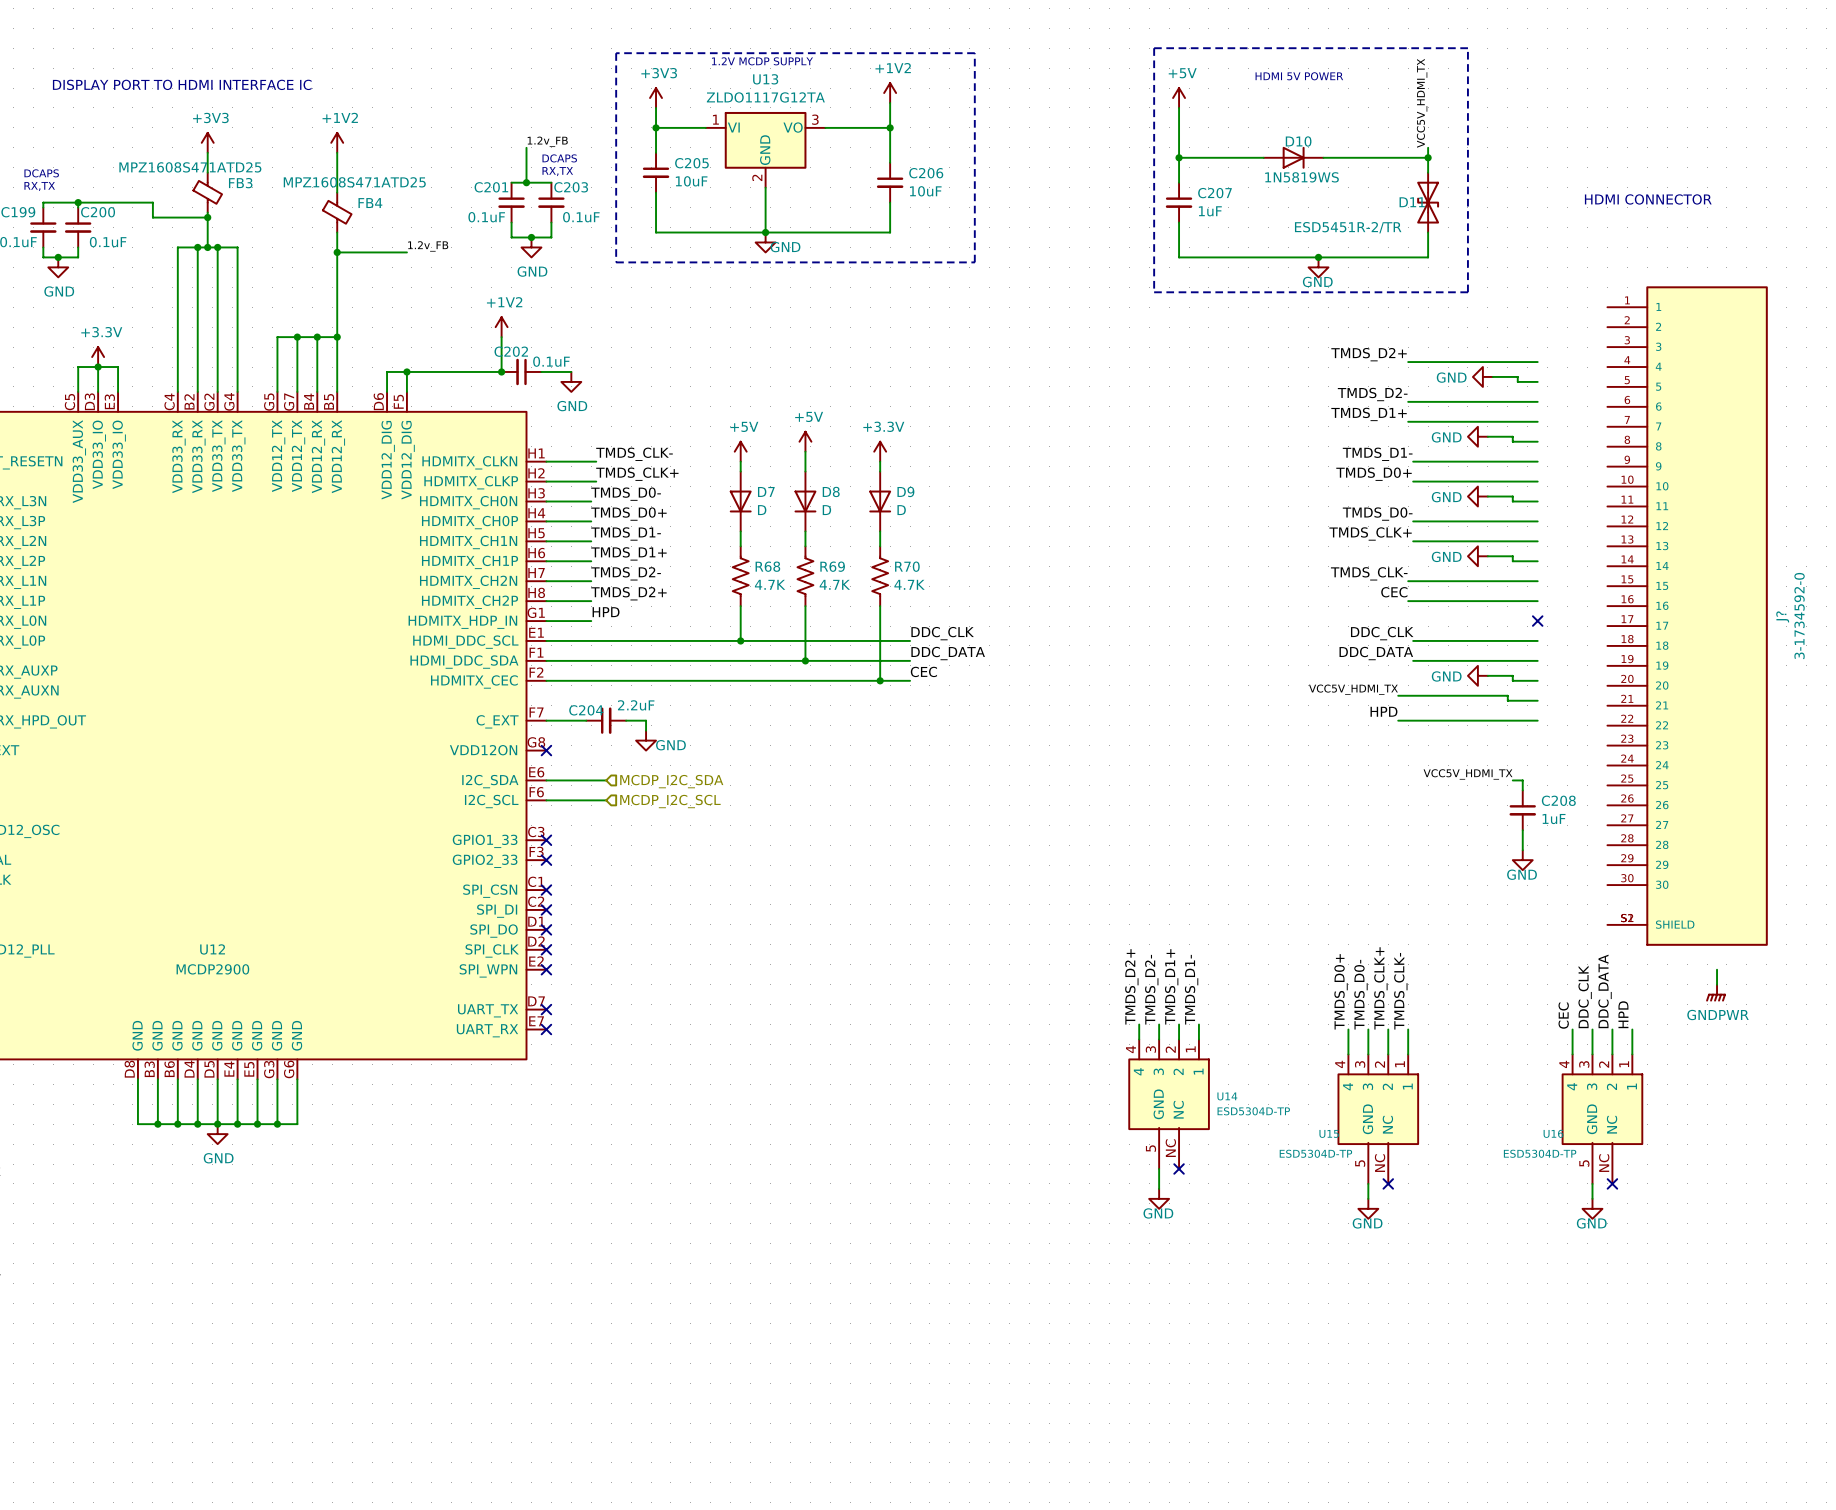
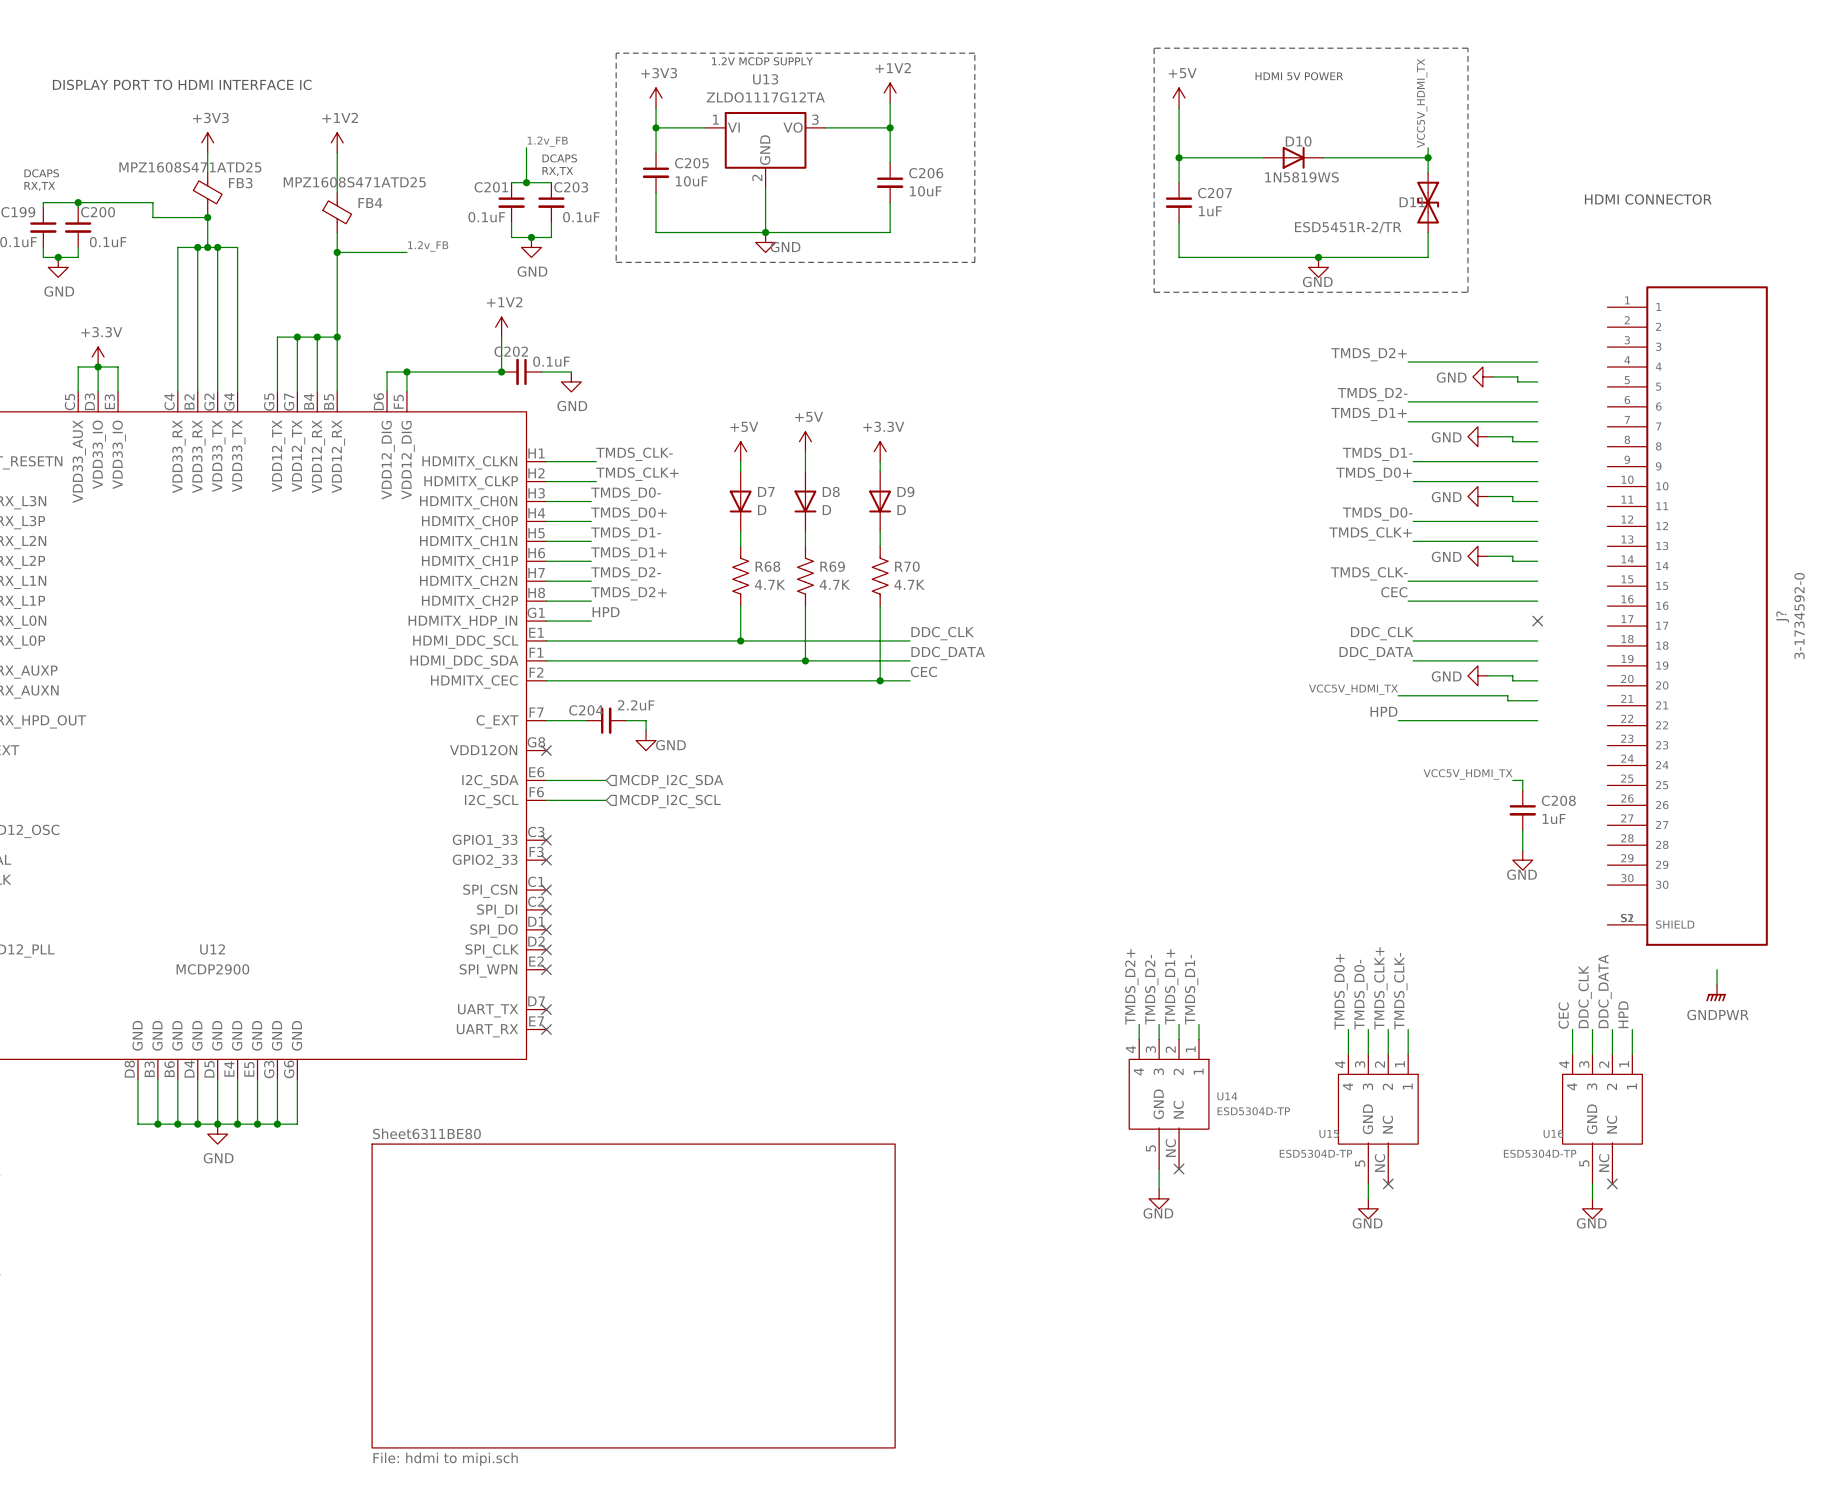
sheet Sheet6311BE80: none -> File: hdmi to mipi.sch (633, 1296)

